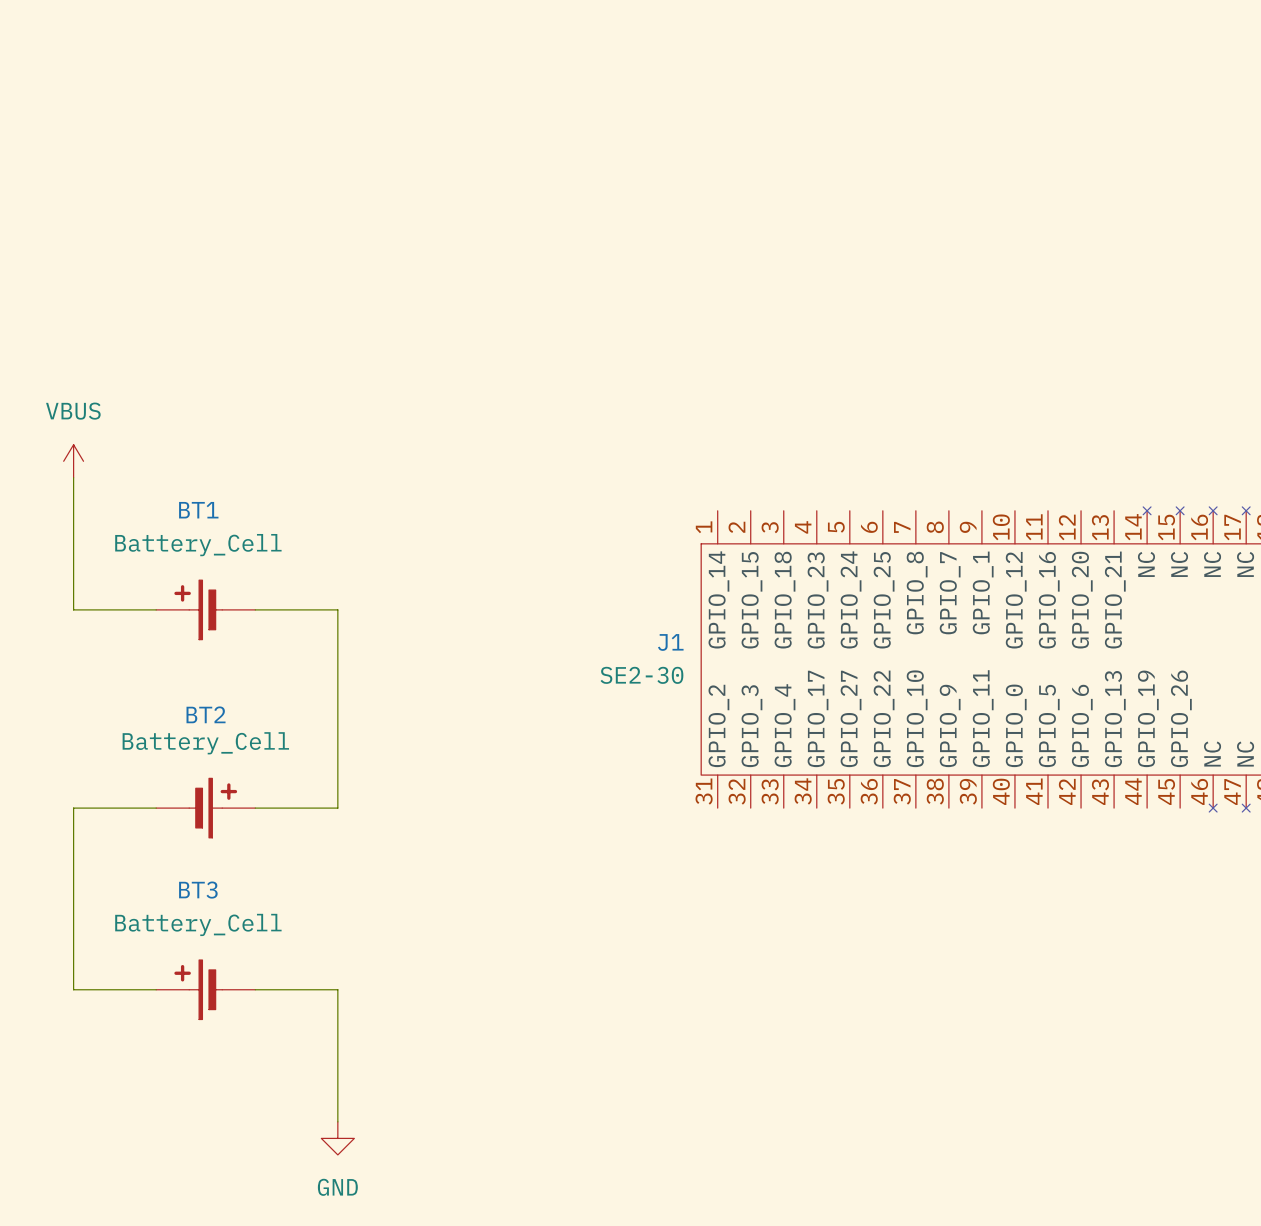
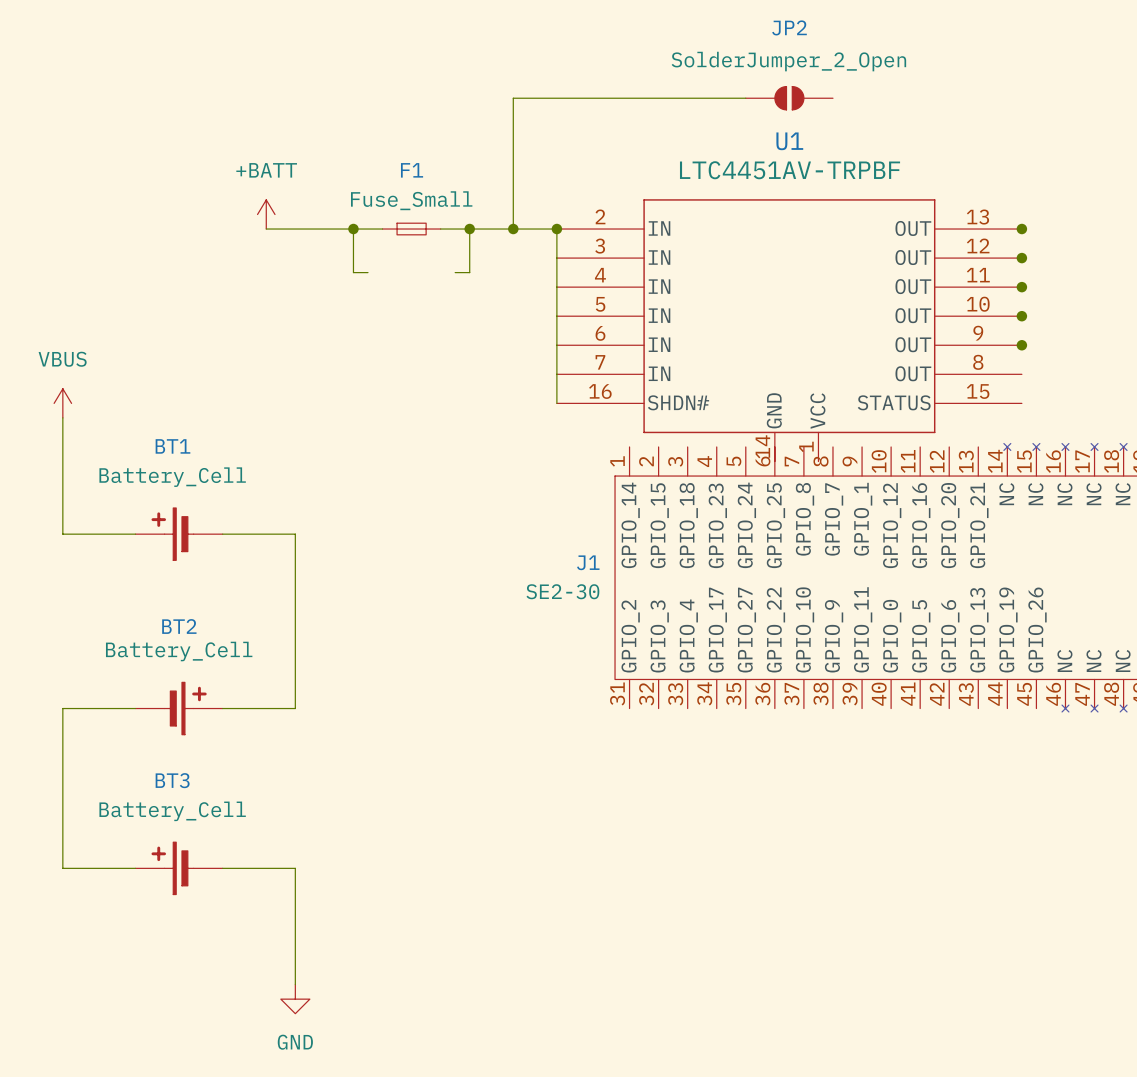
wire: none -> (745, 98) (513, 98) (513, 229)
JP2: none -> SolderJumper_2_Open (789, 98)
power symbol: none -> +BATT (266, 214)
wire: none -> (266, 229) (382, 229)
wire: none -> (353, 229) (353, 272) (367, 272)
junction: none -> (353, 229)
F1: none -> Fuse_Small (411, 229)
wire: none -> (440, 229) (556, 229) (556, 403)
wire: none -> (469, 229) (469, 272) (455, 272)
junction: none -> (469, 229)
junction: none -> (513, 229)
junction: none -> (556, 229)
junction: none -> (1021, 229)
junction: none -> (1021, 258)
junction: none -> (1021, 287)
junction: none -> (1021, 316)
U1: none -> LTC4451AV-TRPBF (789, 330)
junction: none -> (1021, 345)

